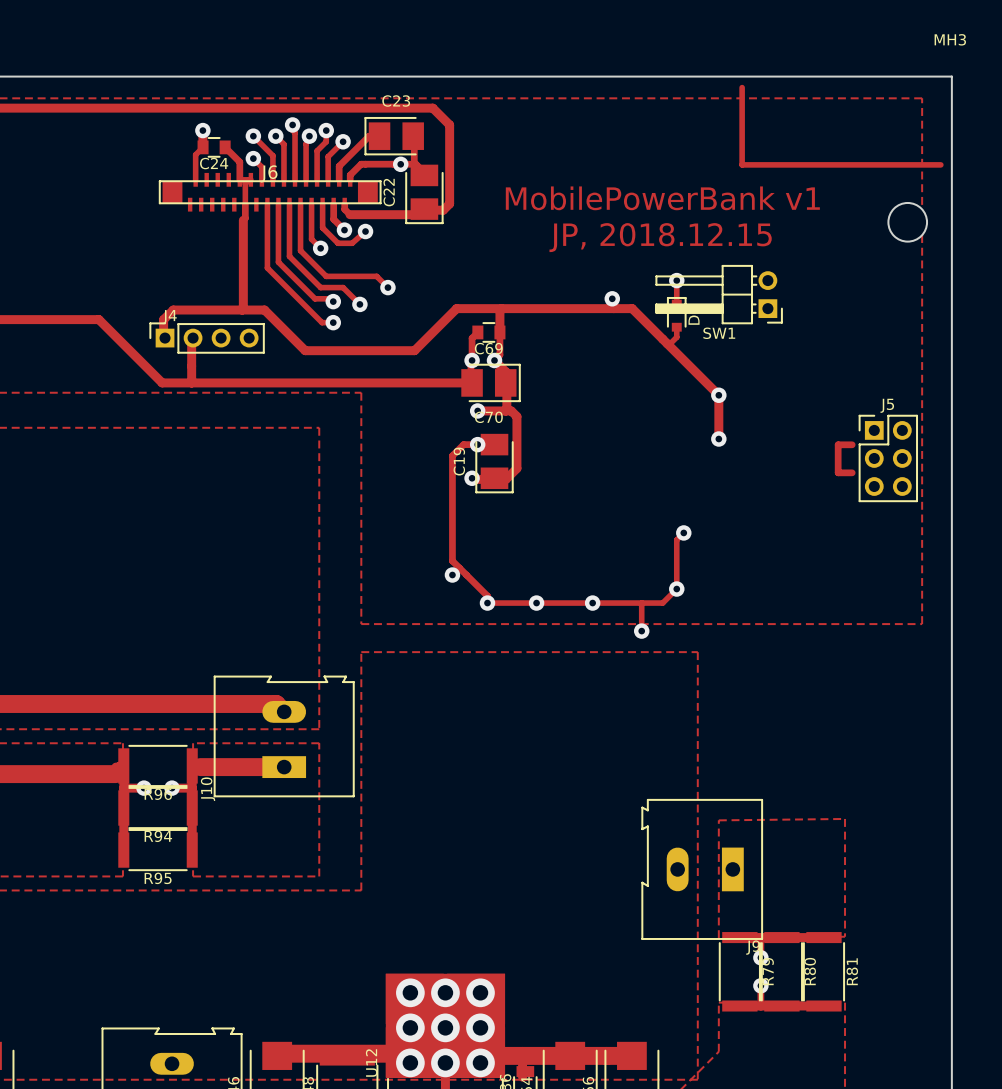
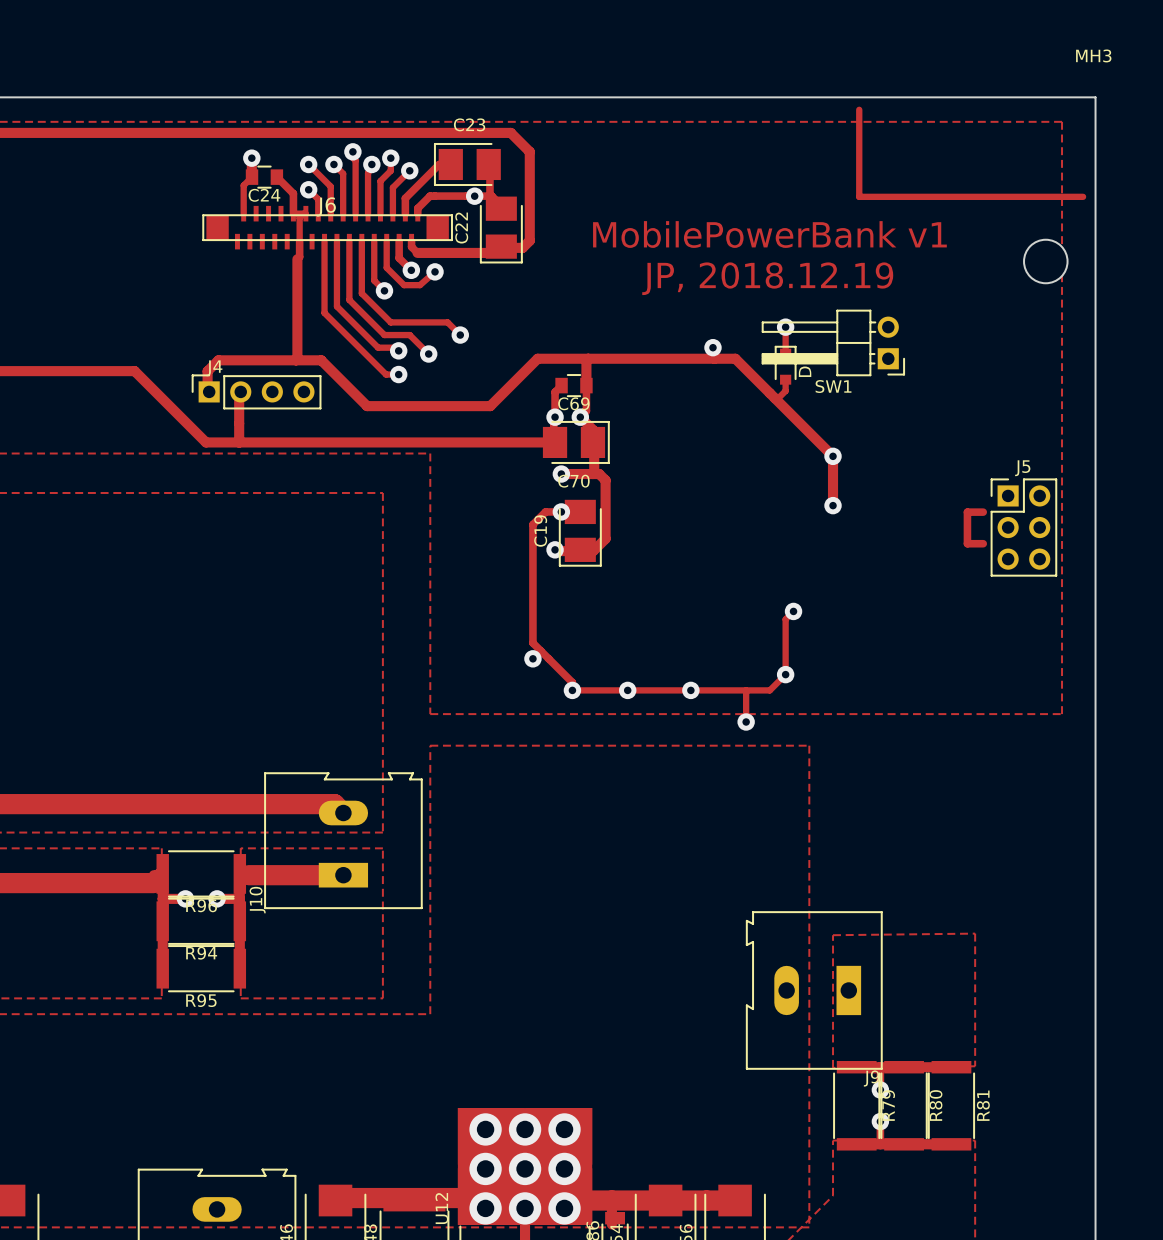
text: JP, 2018.12.15 (660, 237) -> JP, 2018.12.19 (767, 278)

